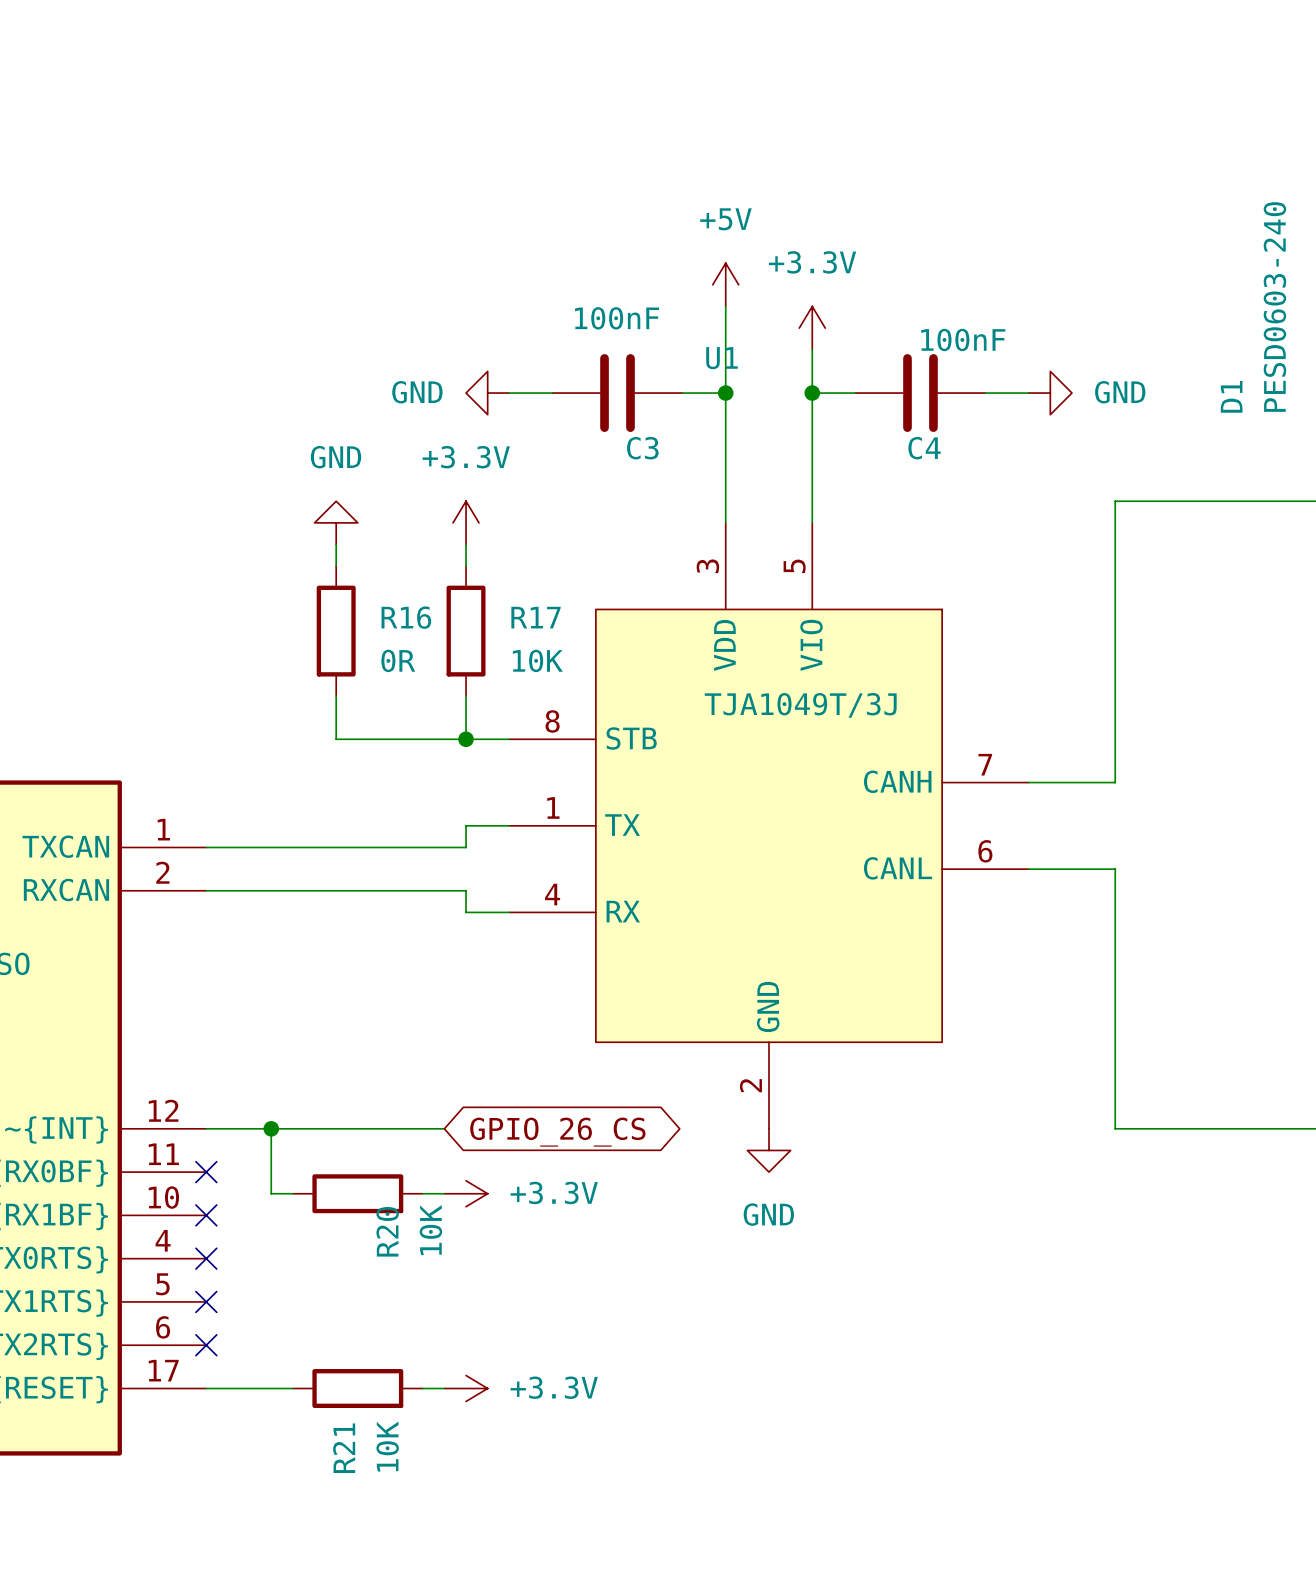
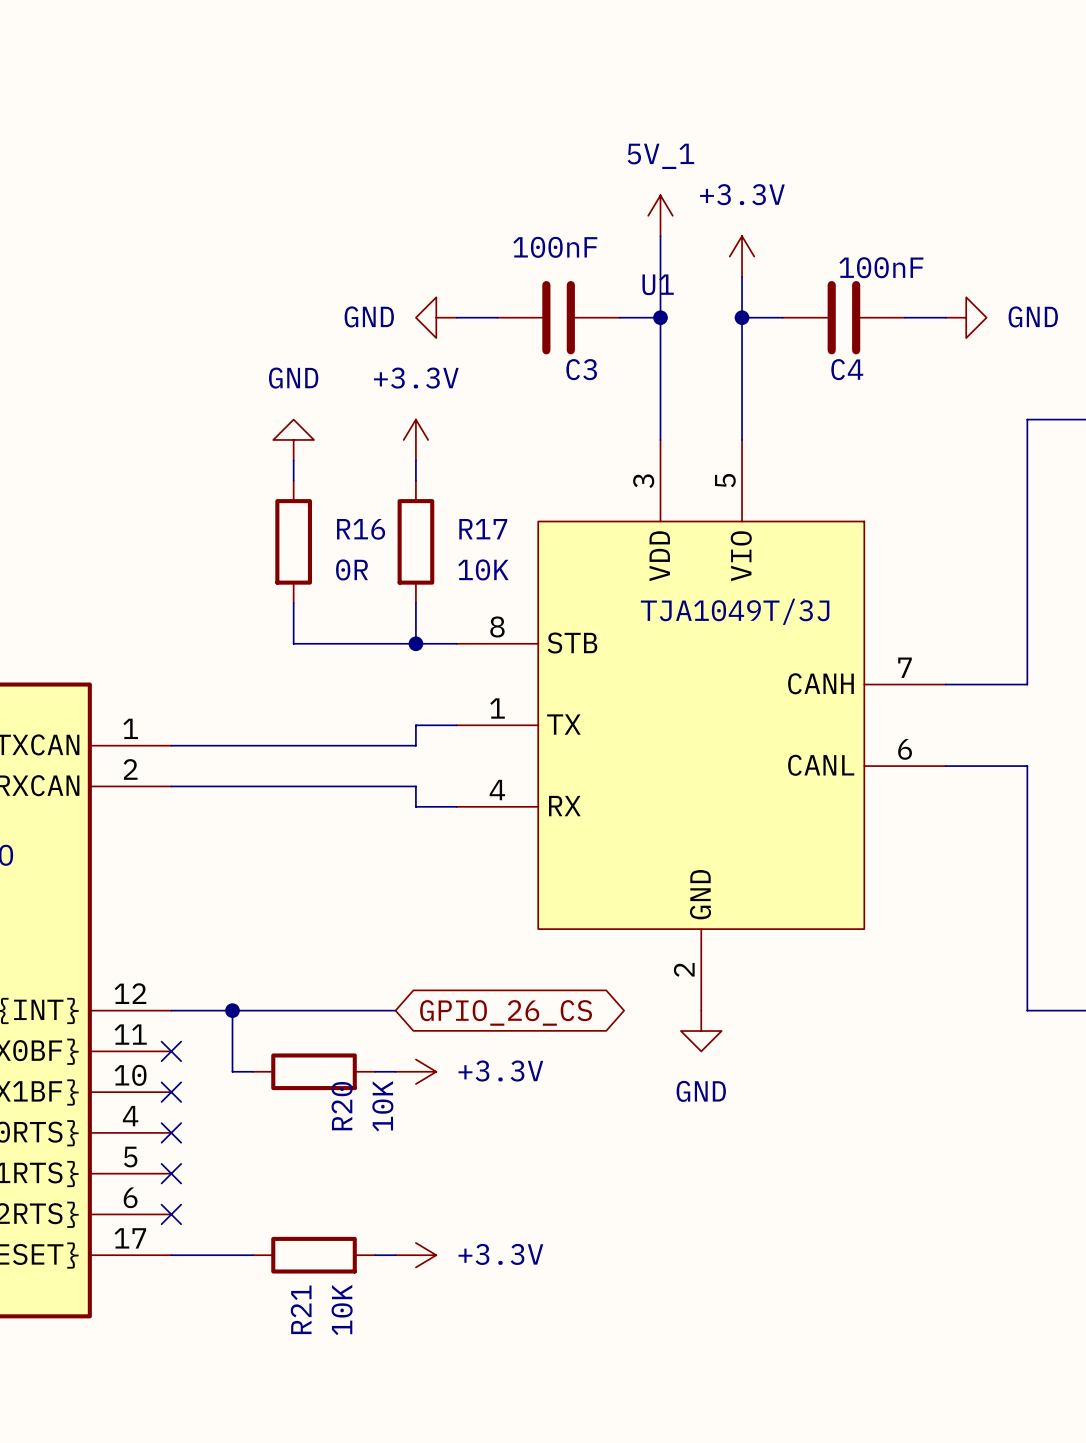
power symbol: +5V (725, 284) -> 5V_1 (660, 215)

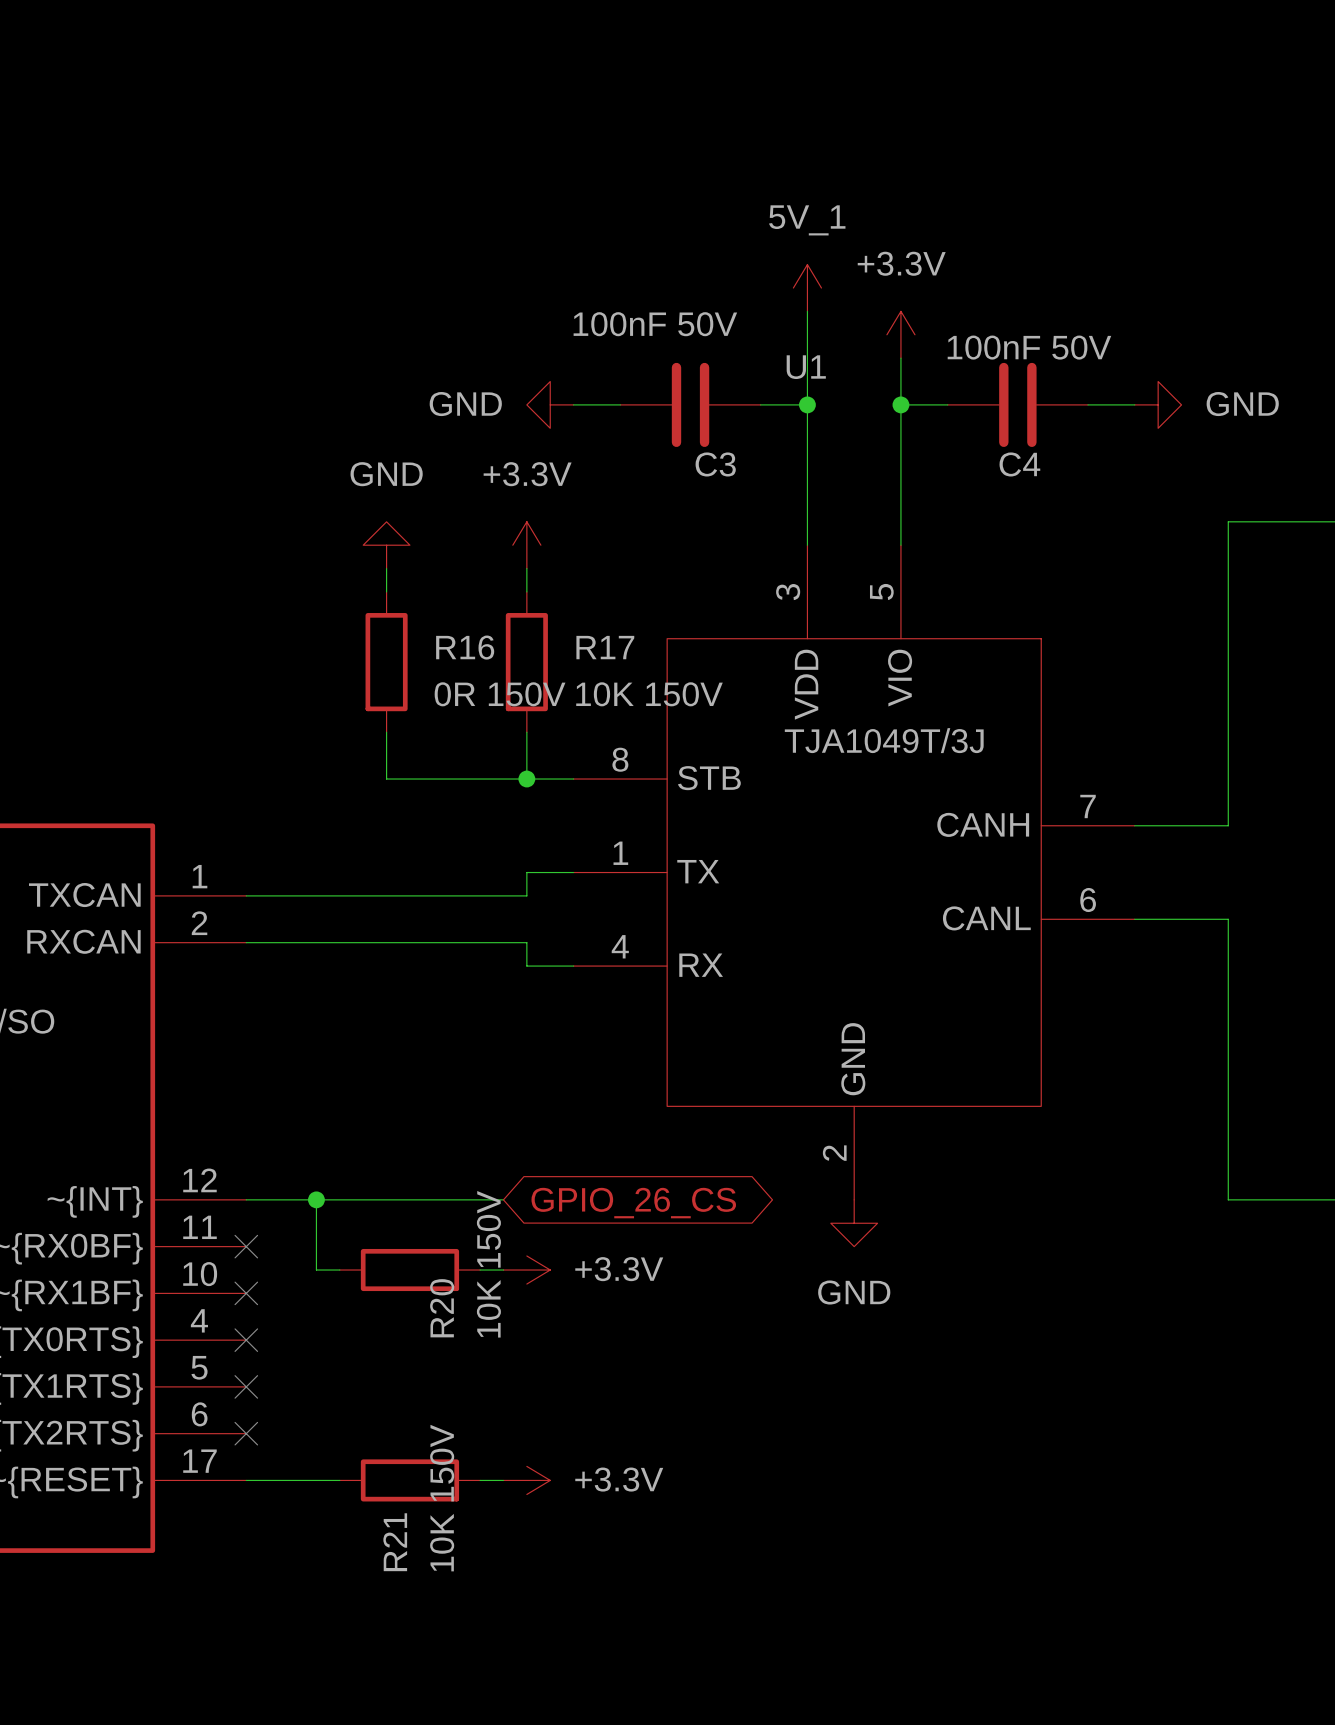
C3 value: 100nF (555, 247) -> 100nF 50V (655, 324)
C4 value: 100nF (881, 267) -> 100nF 50V (1029, 347)
R16 value: 0R (352, 569) -> 0R 150V (500, 694)
R17 value: 10K (483, 569) -> 10K 150V (649, 694)
R20 value: 10K (382, 1106) -> 10K 150V (488, 1264)
R21 value: 10K (342, 1309) -> 10K 150V (442, 1498)

